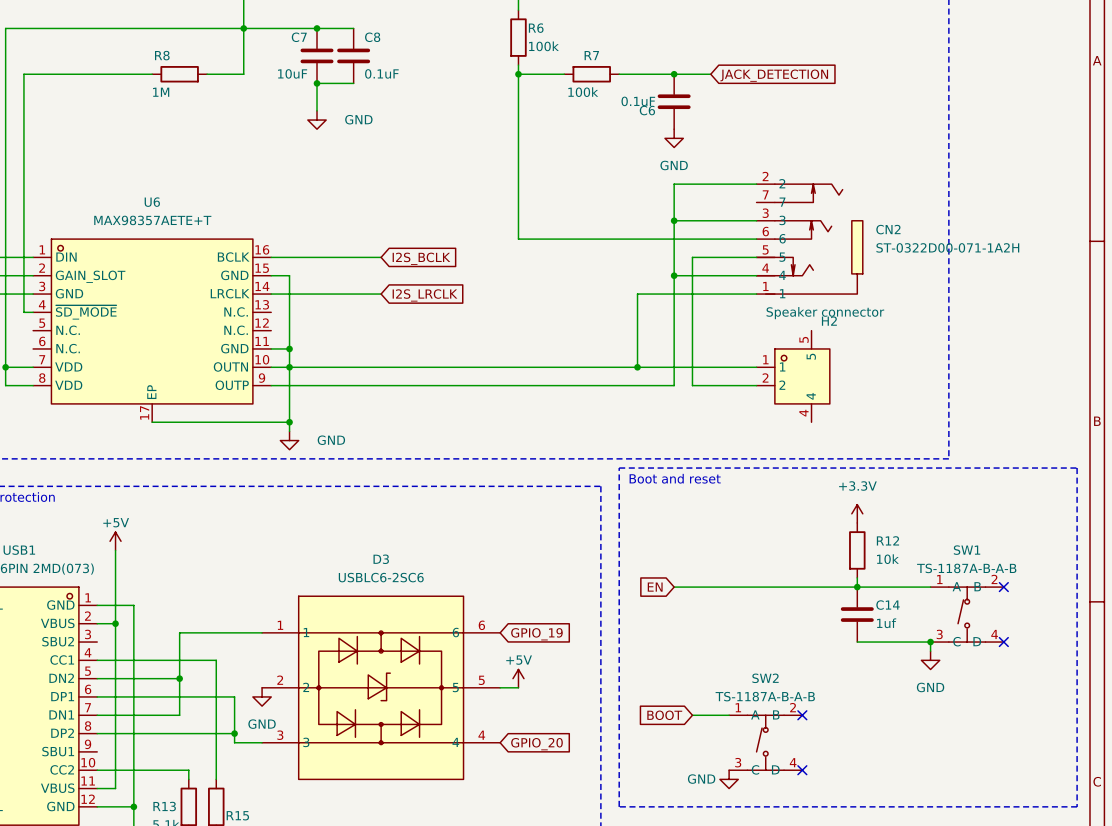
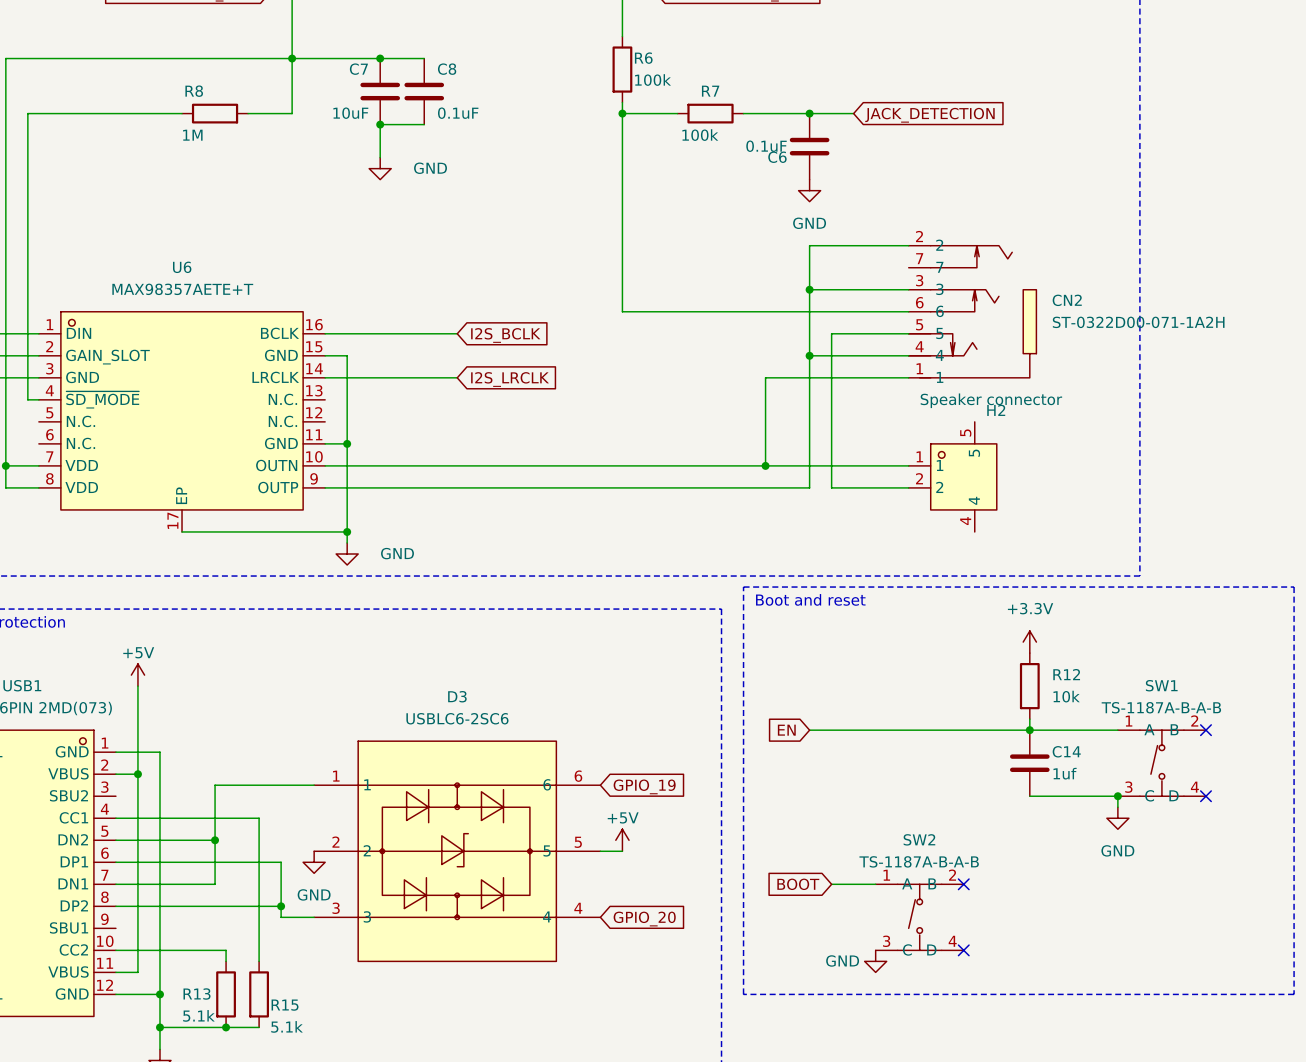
junction: (289, 367) -> none

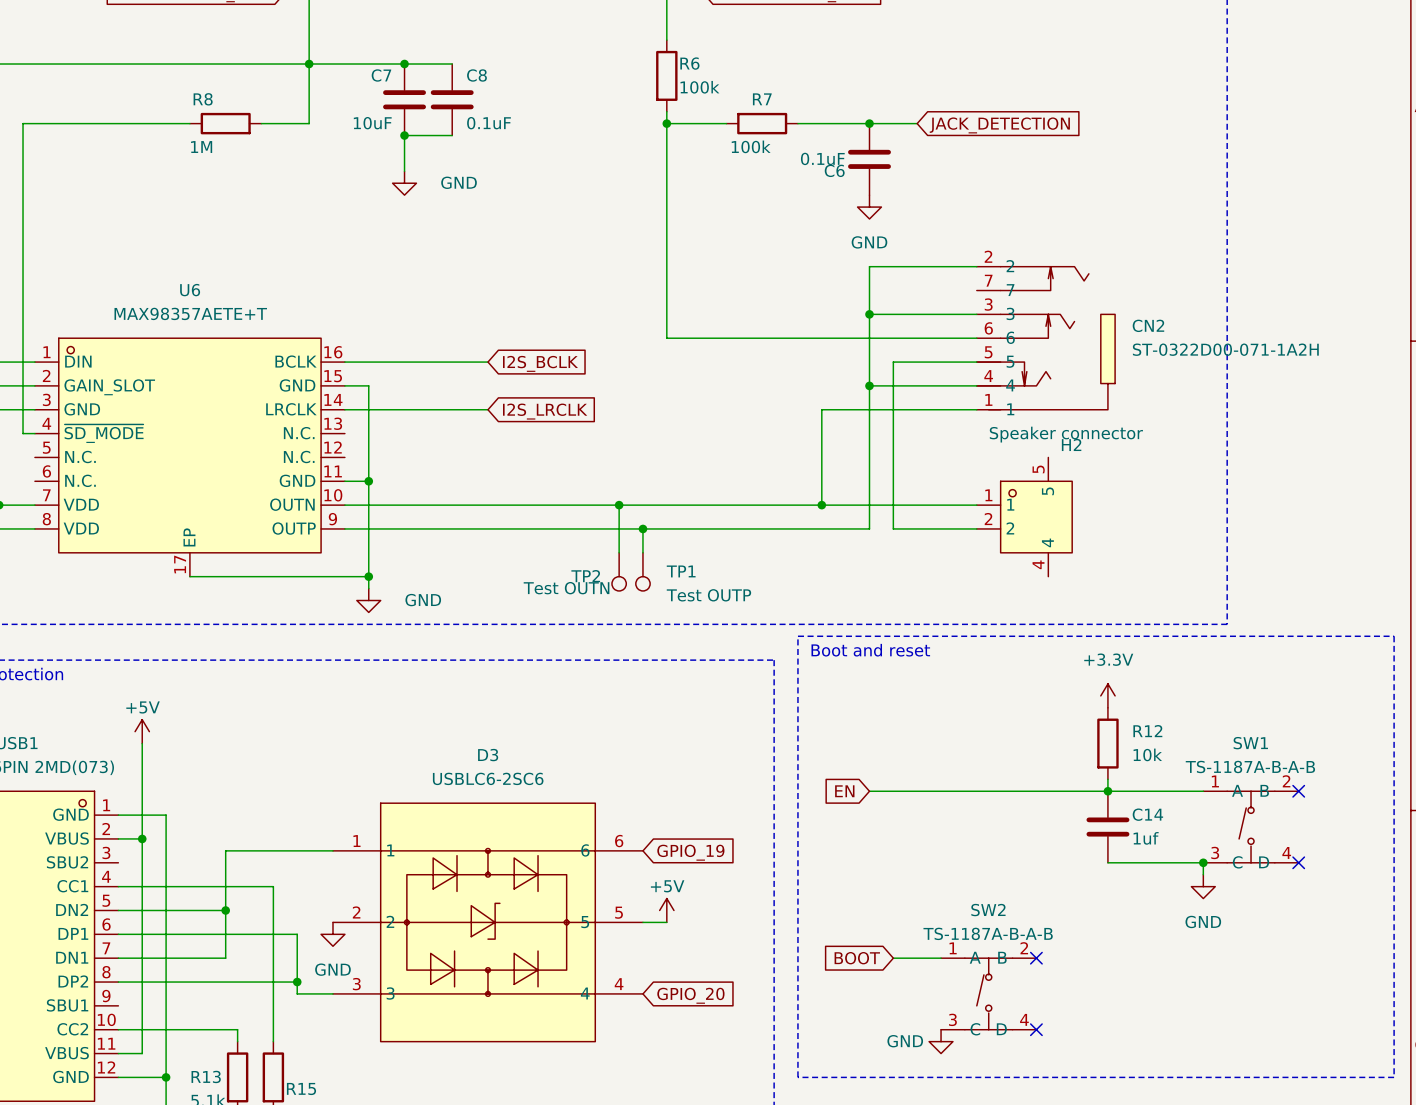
wire: none -> (619, 505) (619, 552)
junction: none -> (619, 505)
wire: none -> (642, 528) (642, 552)
junction: none -> (642, 528)
TP2: none -> Test OUTN (619, 571)
TP1: none -> Test OUTP (642, 571)

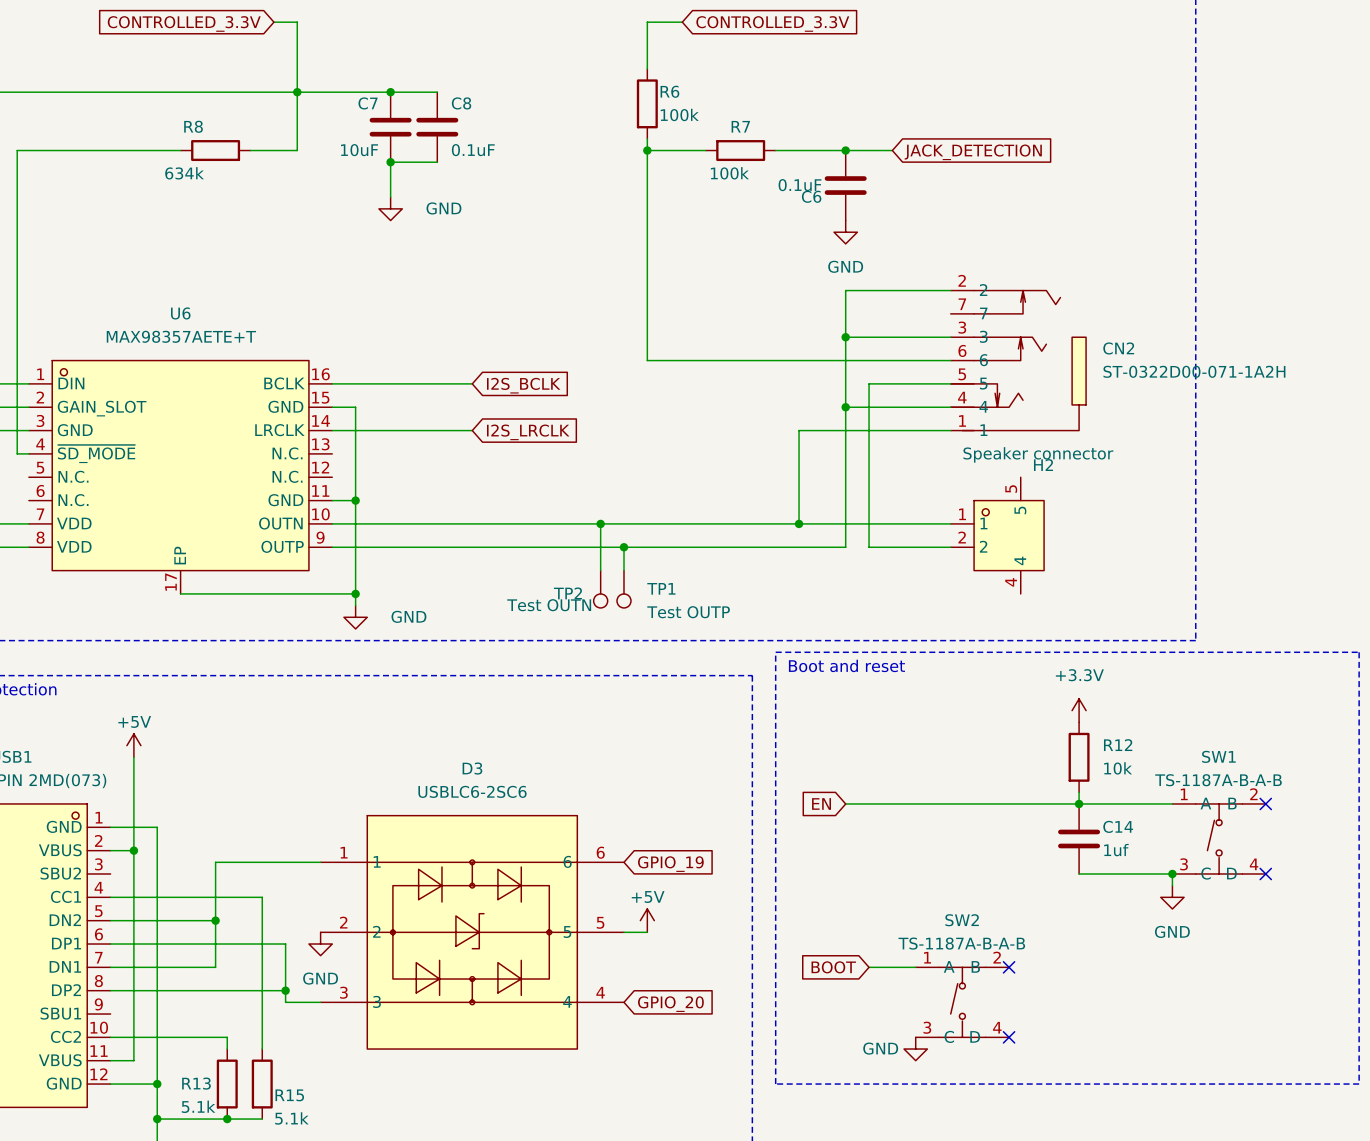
R8 value: 1M (201, 147) -> 634k (184, 173)

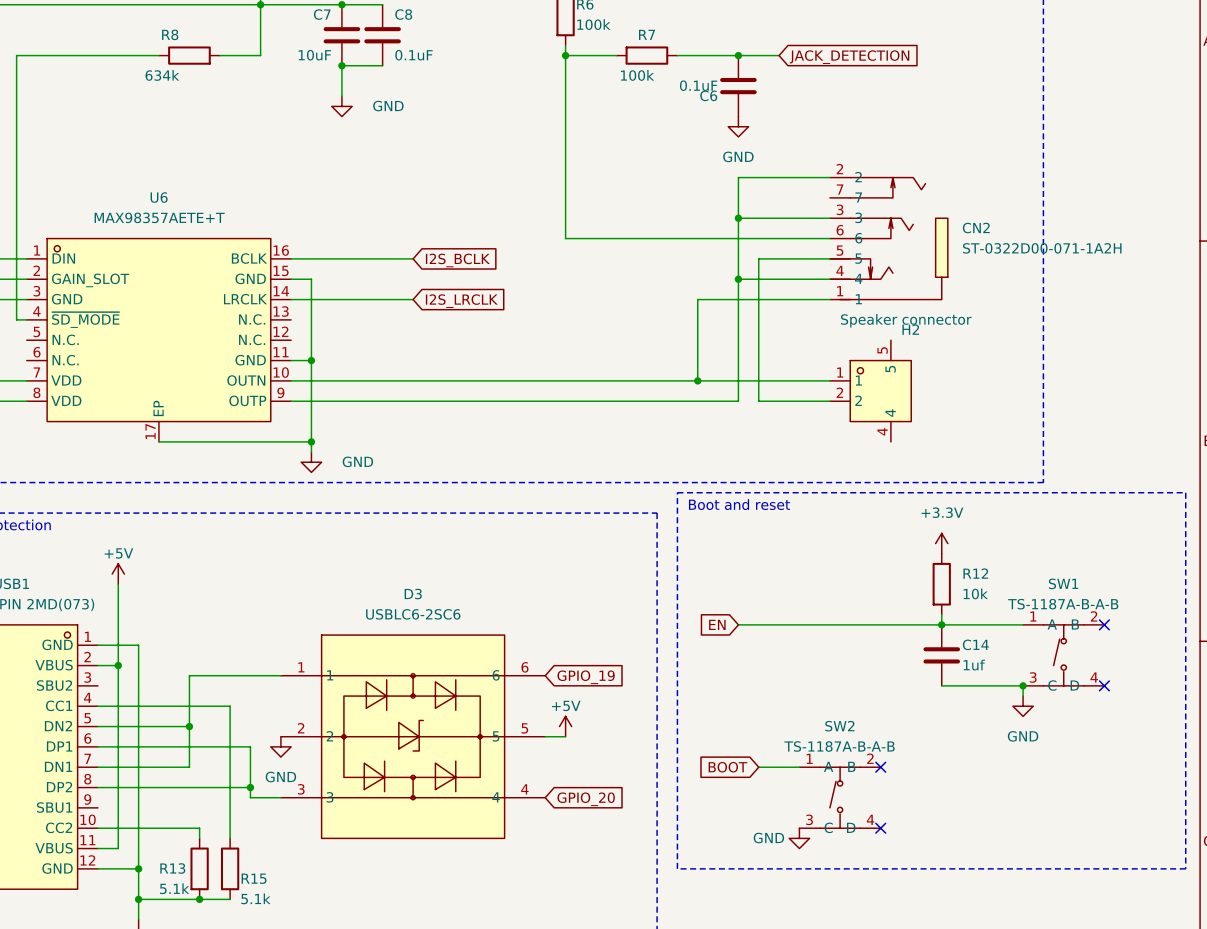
wire: (600, 523) (600, 570) -> none
junction: (600, 523) -> none
wire: (623, 547) (623, 570) -> none
junction: (623, 547) -> none
TP2: Test OUTN (600, 589) -> none
TP1: Test OUTP (623, 589) -> none

